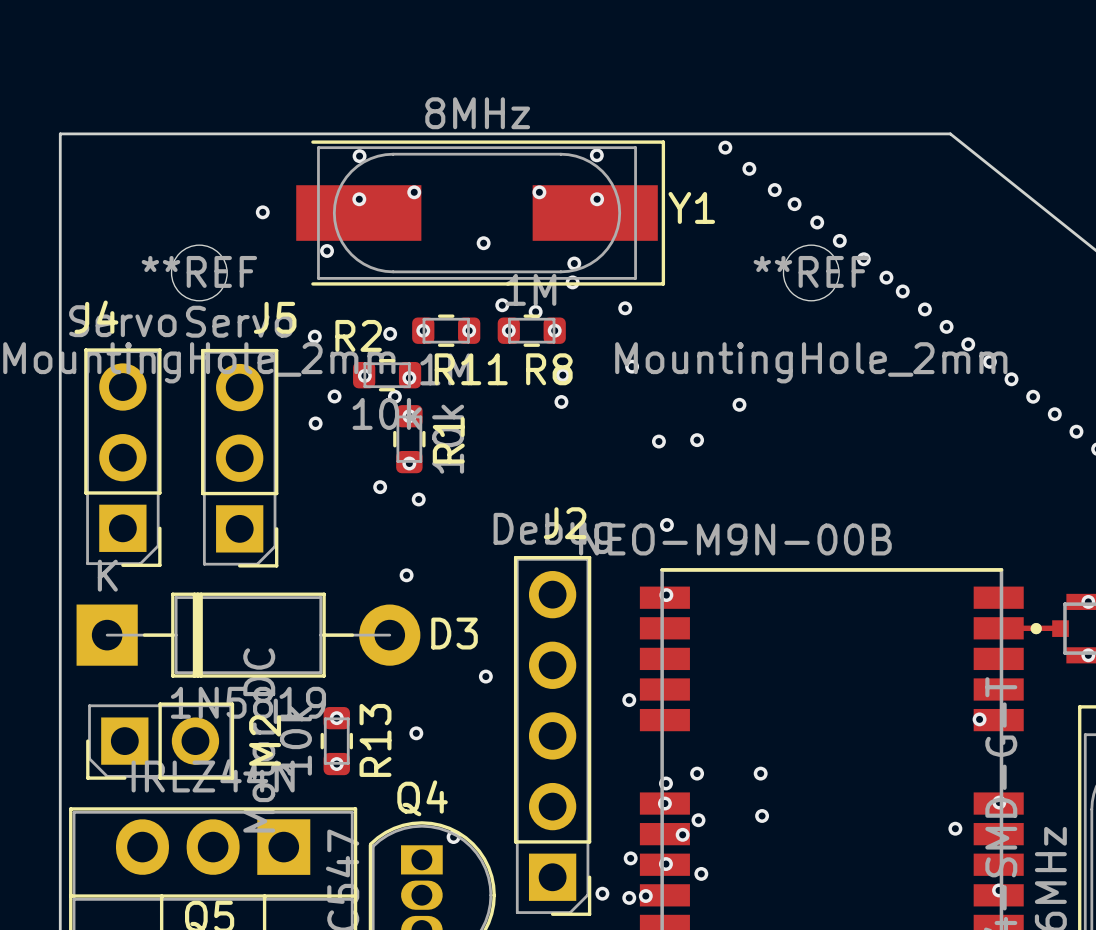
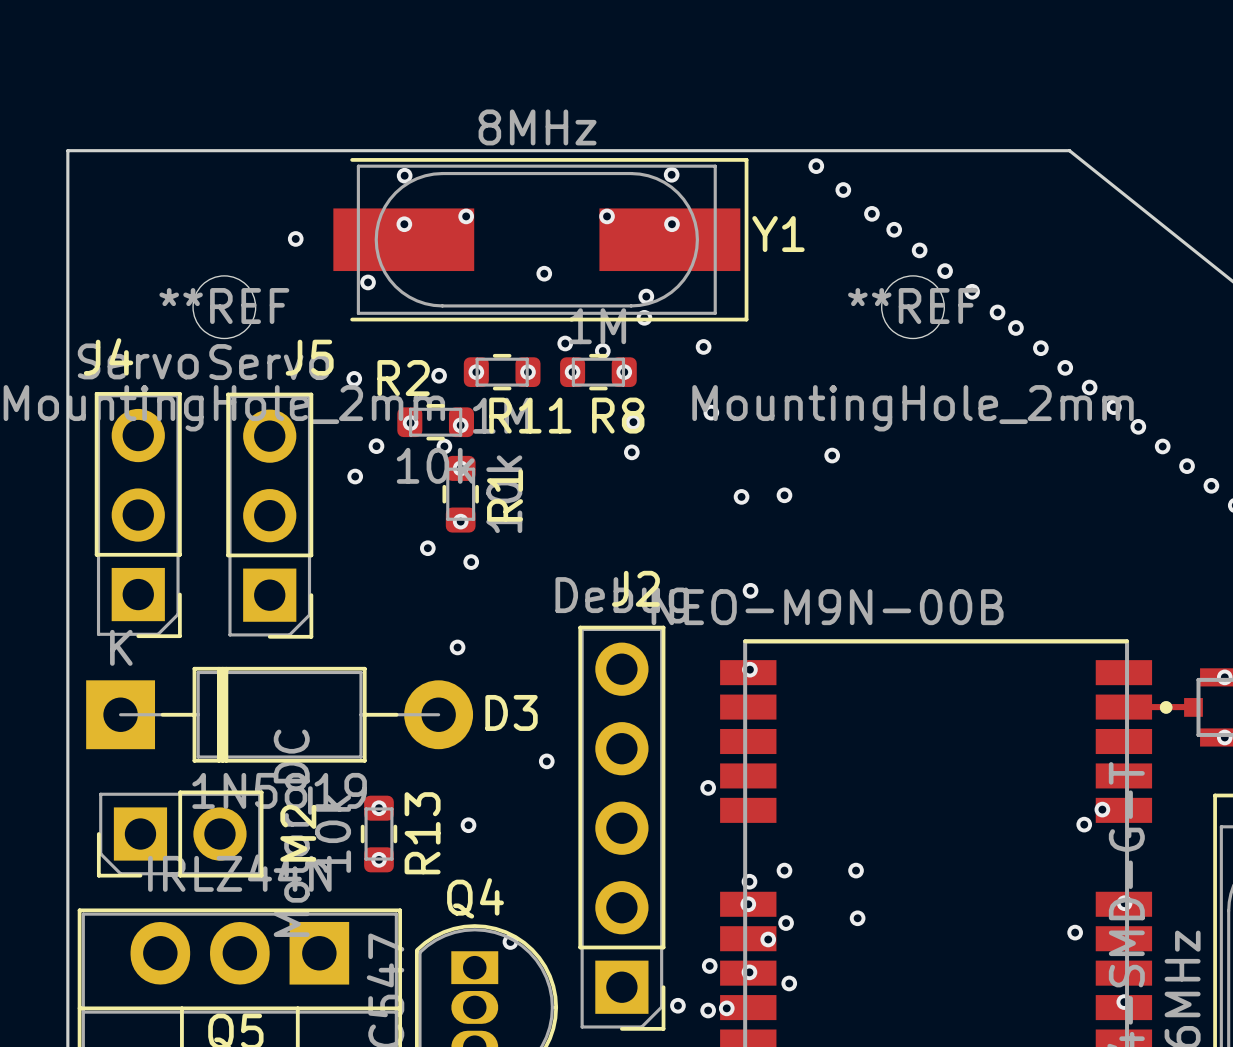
via: none -> (1084, 824)

